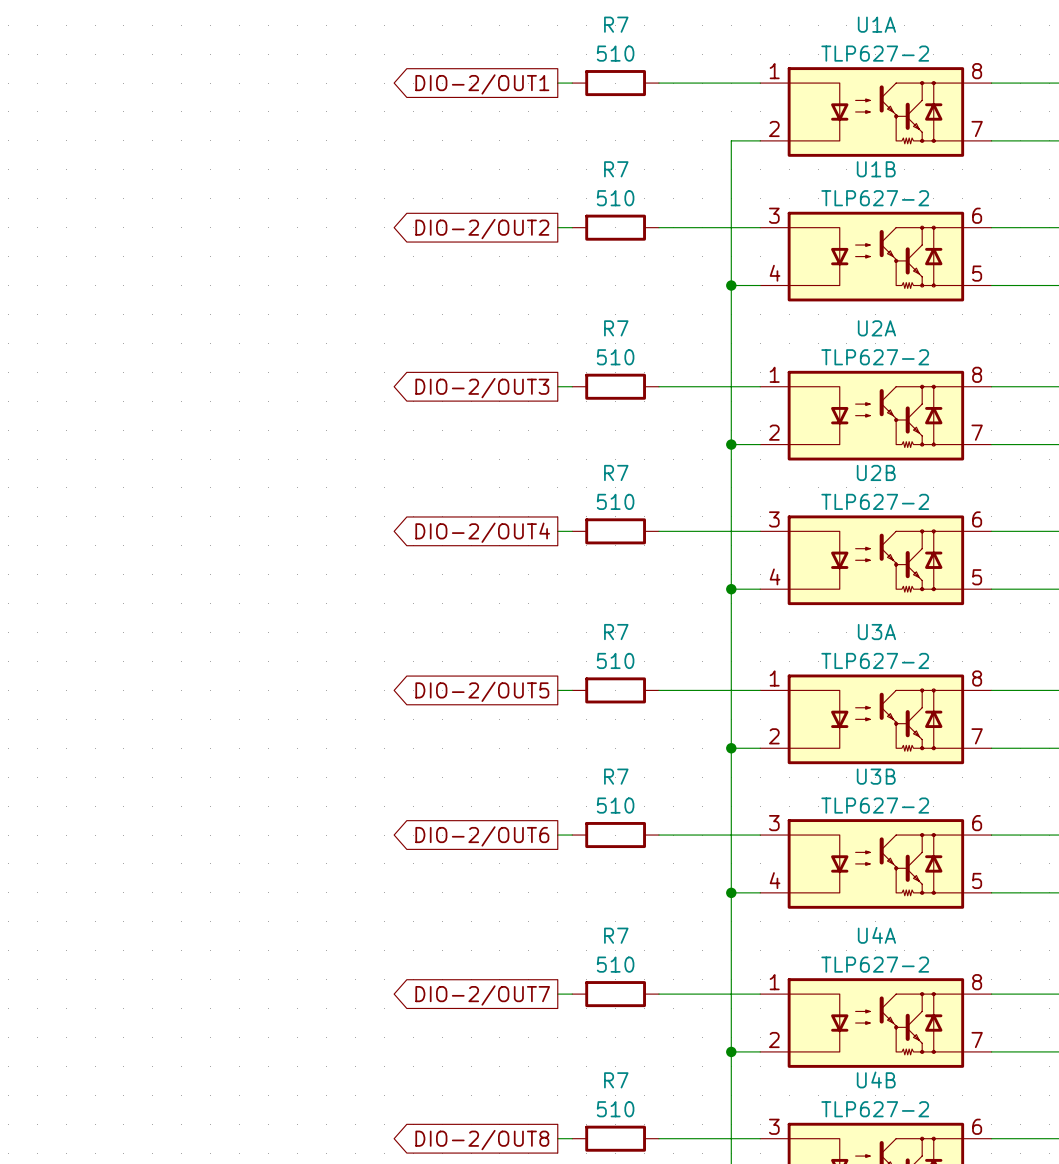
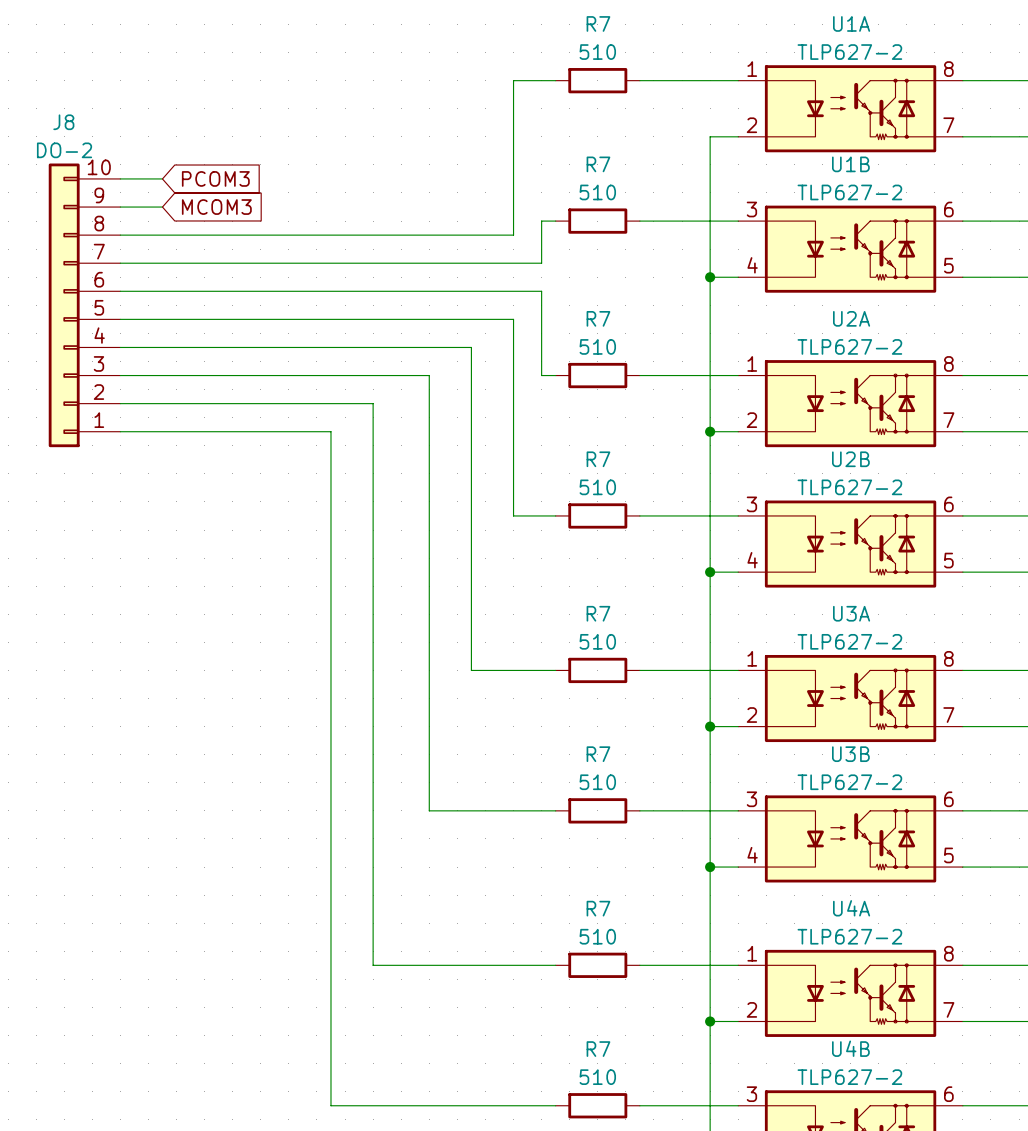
wire: none -> (541, 80) (513, 80) (513, 235) (120, 235)
global label: DIO-2/OUT1 (482, 84) -> none
wire: none -> (120, 178) (162, 178)
global label: none -> PCOM3 (215, 178)
wire: none -> (120, 207) (162, 207)
global label: none -> MCOM3 (216, 207)
wire: none -> (541, 221) (541, 263) (120, 263)
global label: DIO-2/OUT2 (482, 229) -> none
wire: none -> (120, 291) (541, 291) (541, 375)
J8: none -> DO-2 (84, 305)
wire: none -> (120, 319) (513, 319) (513, 515) (541, 515)
wire: none -> (120, 347) (471, 347) (471, 670) (541, 670)
wire: none -> (120, 375) (429, 375) (429, 810) (541, 810)
global label: DIO-2/OUT3 (482, 388) -> none
wire: none -> (120, 403) (373, 403) (373, 965) (541, 965)
wire: none -> (120, 431) (330, 431) (330, 1105) (541, 1105)
global label: DIO-2/OUT4 (482, 532) -> none
global label: DIO-2/OUT5 (482, 691) -> none
global label: DIO-2/OUT6 (482, 836) -> none
global label: DIO-2/OUT7 (482, 995) -> none
global label: DIO-2/OUT8 (482, 1140) -> none

